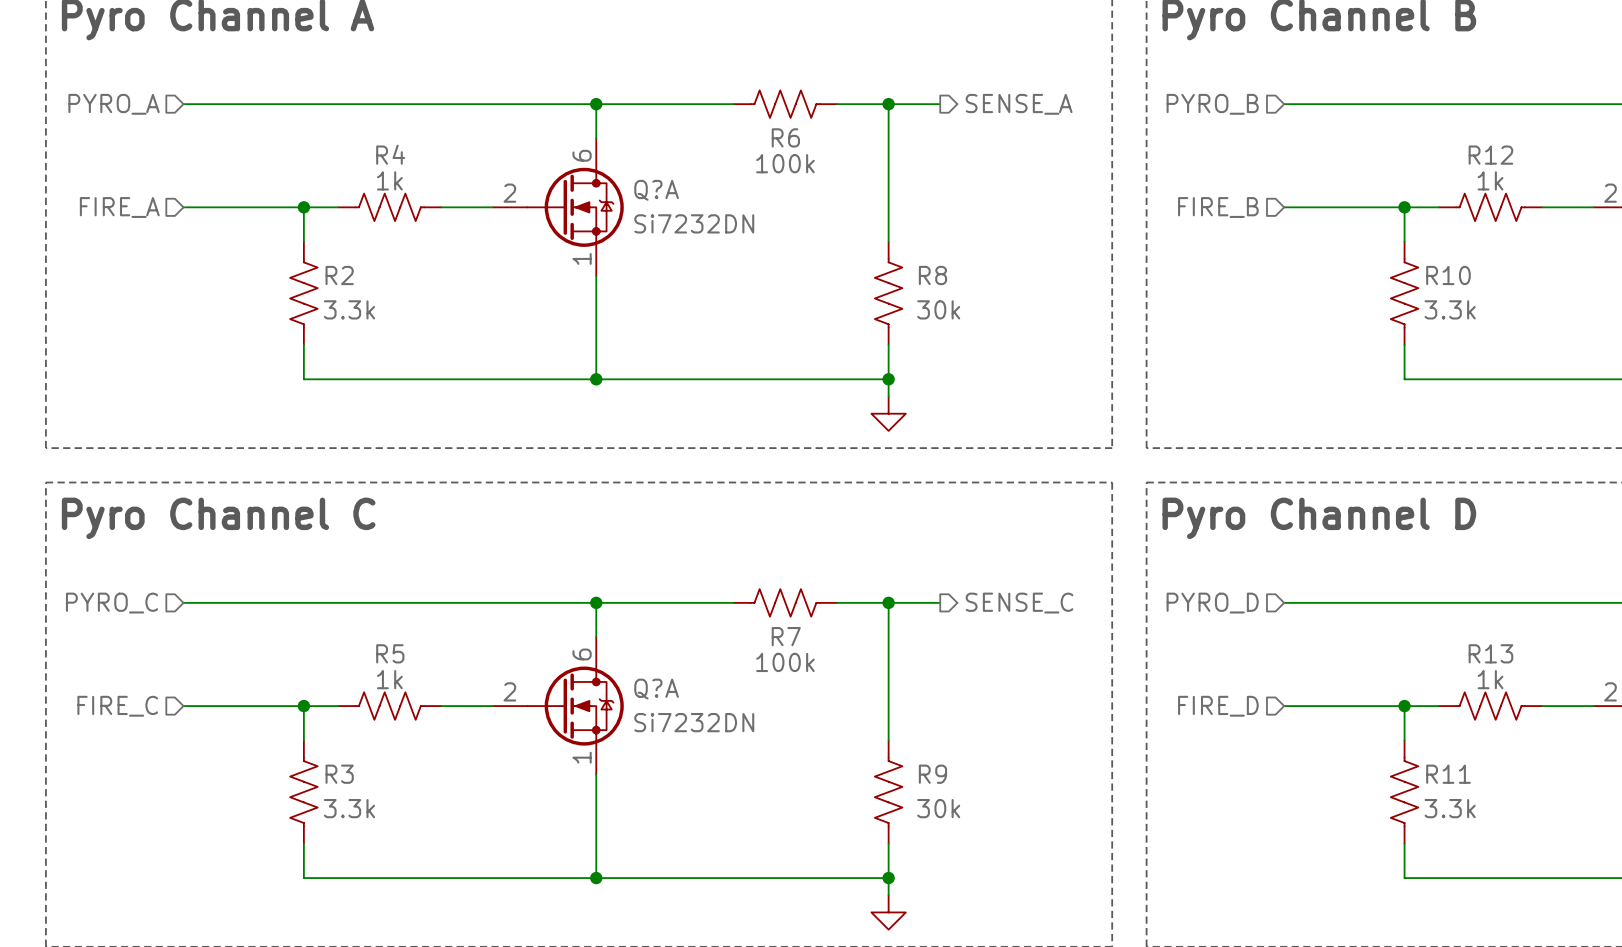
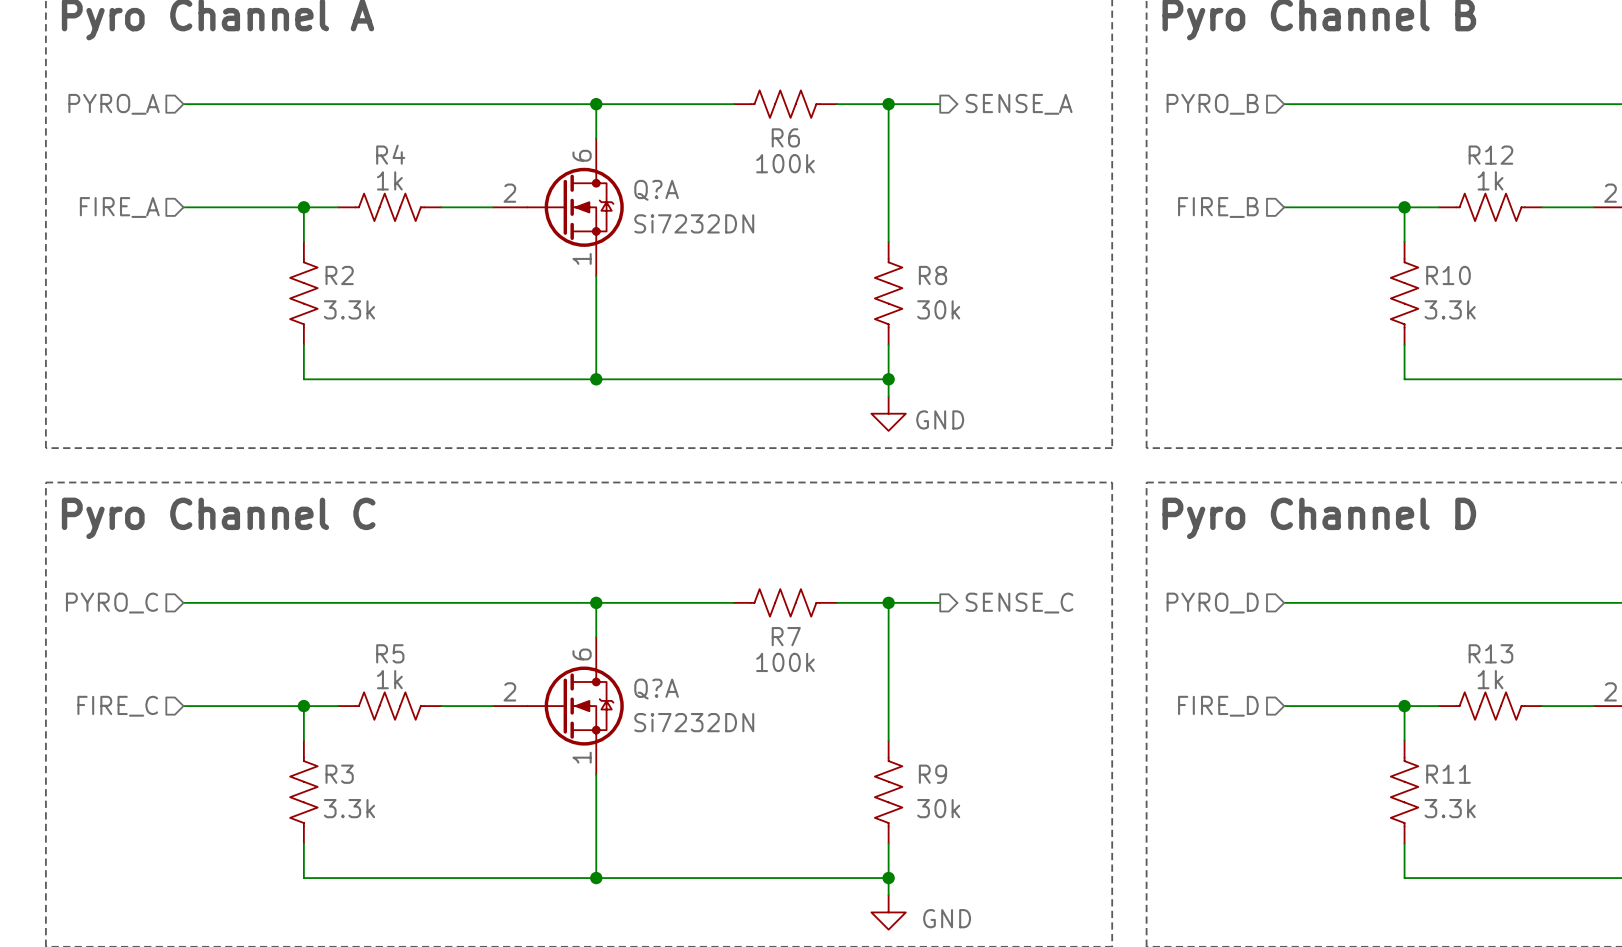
power symbol text: none -> GND (940, 419)
power symbol text: none -> GND (947, 918)

